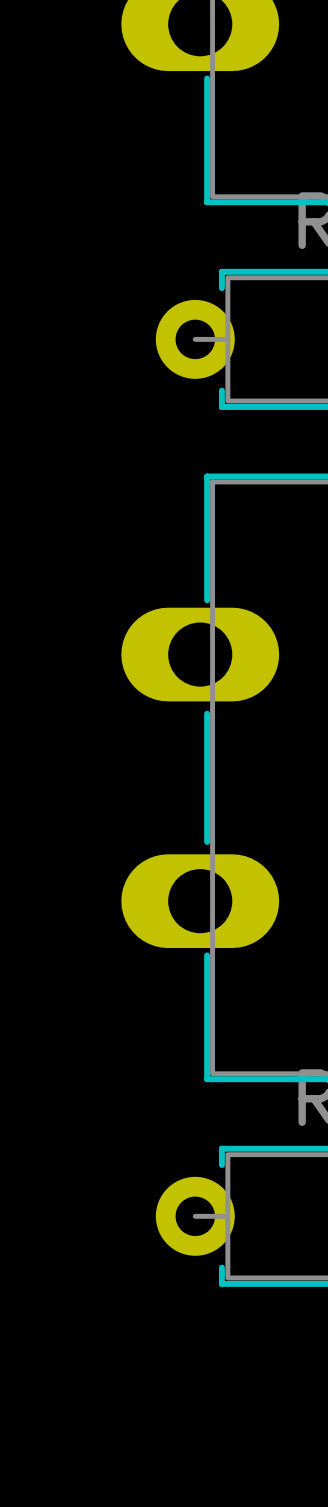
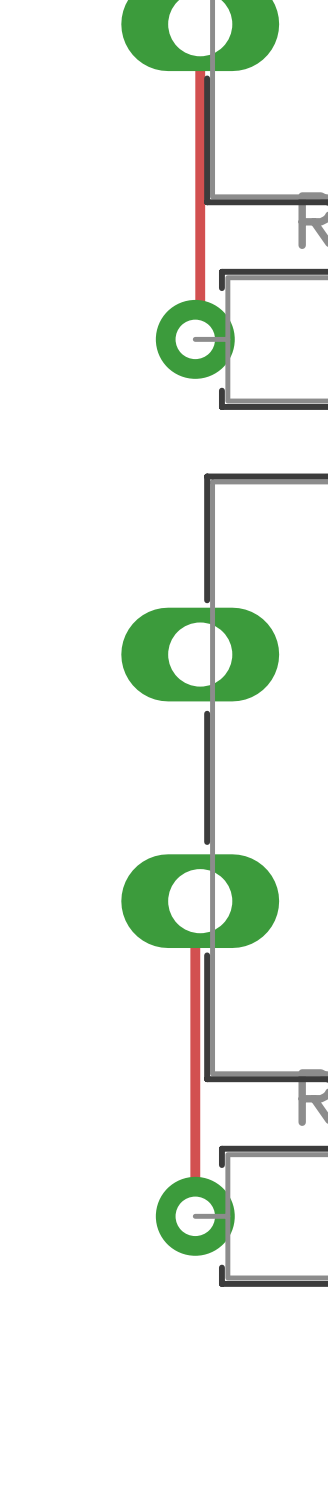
track: none -> (200, 24) (200, 303) (195, 308) (195, 339)
track: none -> (200, 901) (195, 906) (195, 1216)

